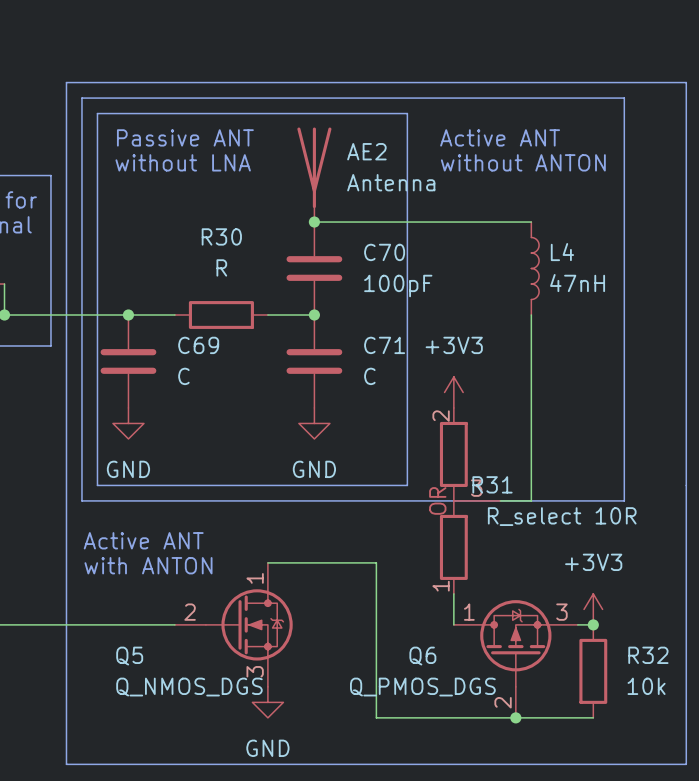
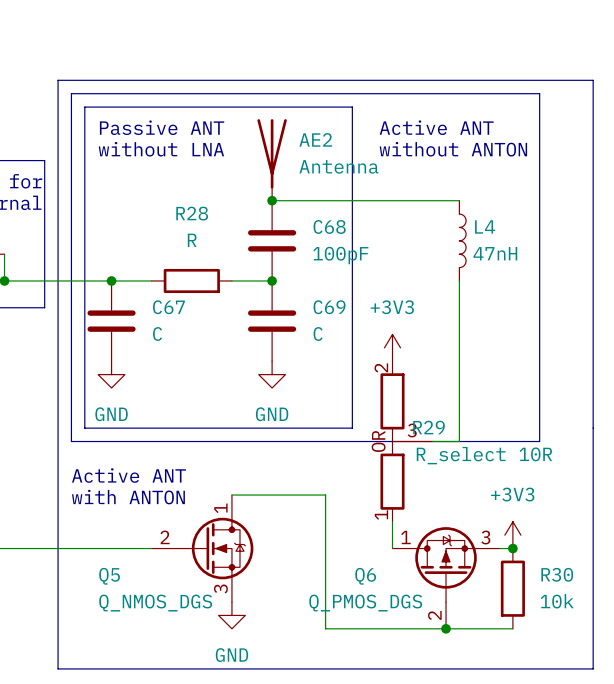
R30 name: R30 (221, 236) -> R28 (192, 213)
C70 name: C70 (384, 252) -> C68 (329, 226)
C69 name: C69 (198, 345) -> C67 (168, 307)
C71 name: C71 (384, 345) -> C69 (329, 307)
R31 name: R31 (492, 484) -> R29 (429, 427)
R32 name: R32 (648, 655) -> R30 (557, 574)

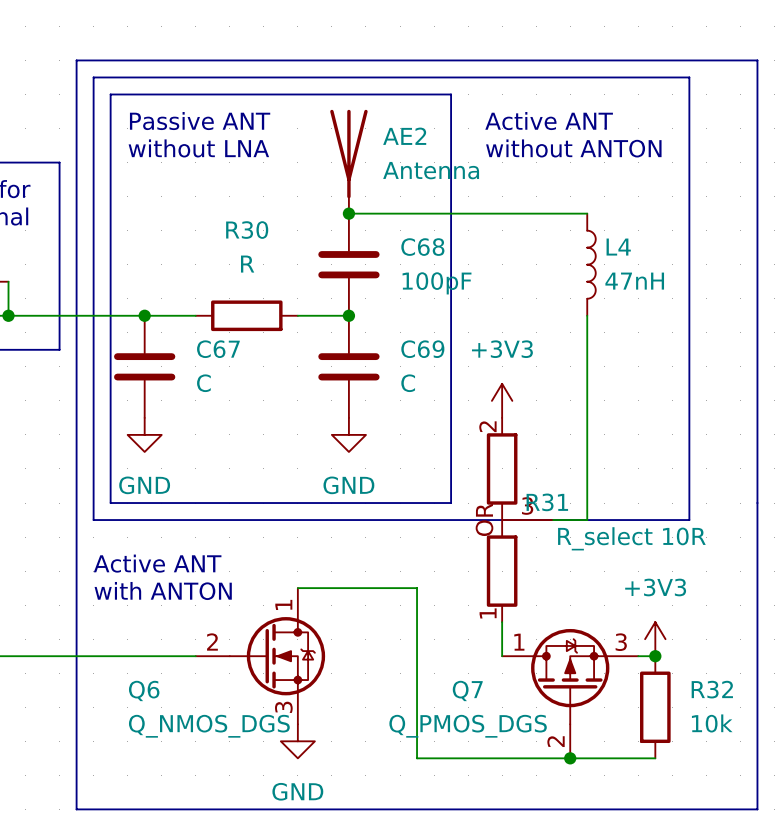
R28 name: R28 (192, 213) -> R30 (247, 230)
R29 name: R29 (429, 427) -> R31 (547, 502)
R30 name: R30 (557, 574) -> R32 (712, 689)
Q5 name: Q5 (109, 576) -> Q6 (144, 690)
Q6 name: Q6 (365, 576) -> Q7 (467, 690)

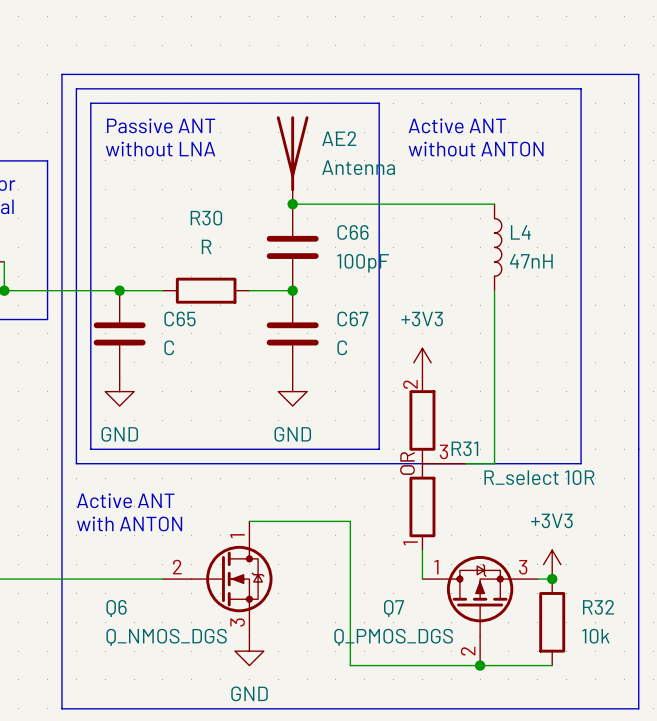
C68 name: C68 (422, 247) -> C66 (353, 232)
C67 name: C67 (218, 349) -> C65 (179, 318)
C69 name: C69 (422, 349) -> C67 (352, 318)

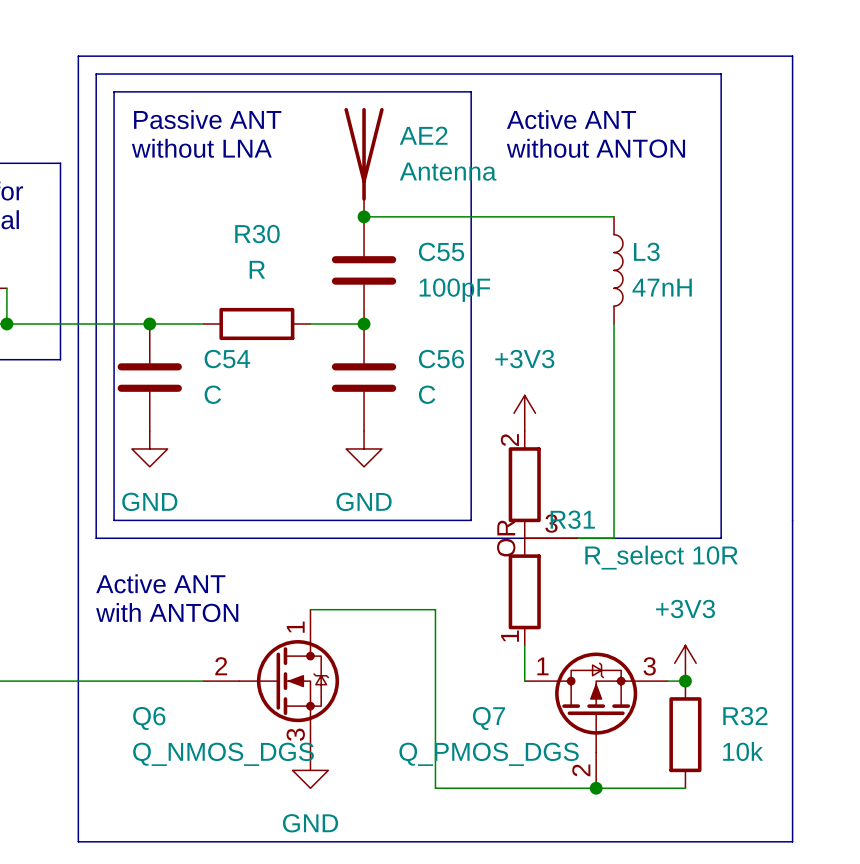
C66 name: C66 (353, 232) -> C55 (441, 251)
L4 name: L4 (520, 232) -> L3 (646, 251)
C65 name: C65 (179, 318) -> C54 (227, 359)
C67 name: C67 (352, 318) -> C56 (441, 359)

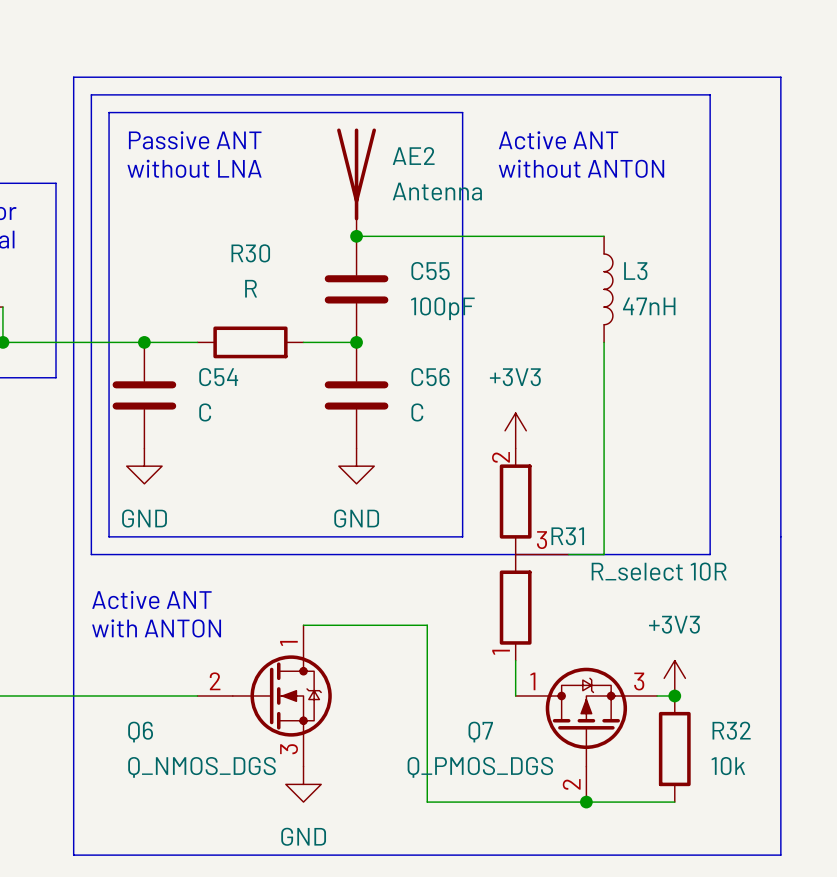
R31 text: OR (506, 538) -> none

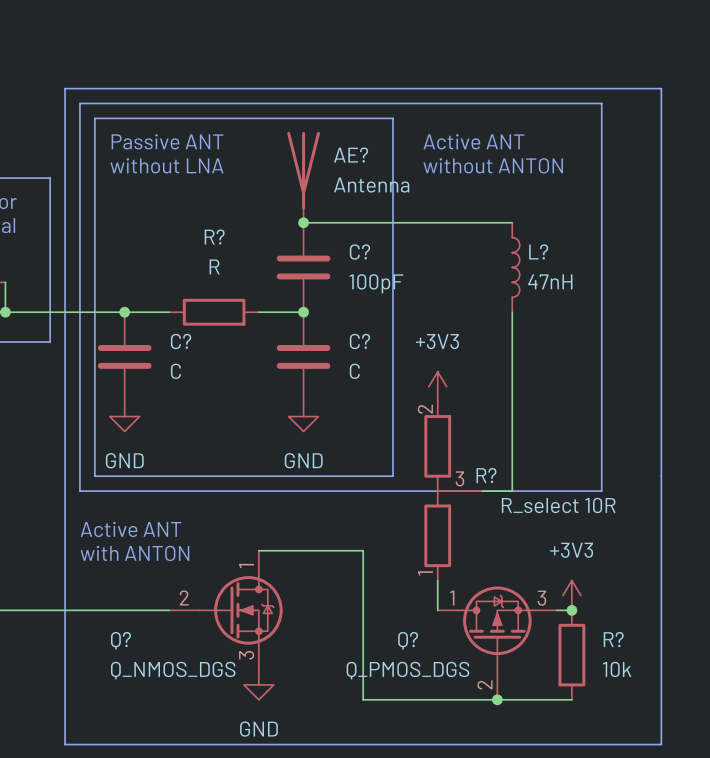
AE2 name: AE2 (413, 156) -> AE? (351, 155)
R30 name: R30 (250, 253) -> R? (214, 237)
C55 name: C55 (430, 271) -> C? (359, 252)
L3 name: L3 (635, 271) -> L? (538, 251)
C54 name: C54 (218, 377) -> C? (181, 341)
C56 name: C56 (430, 377) -> C? (359, 341)
R31 name: R31 (567, 536) -> R? (486, 475)
R32 name: R32 (731, 730) -> R? (613, 639)
Q6 name: Q6 (140, 732) -> Q? (120, 640)
Q7 name: Q7 (480, 732) -> Q? (408, 640)

